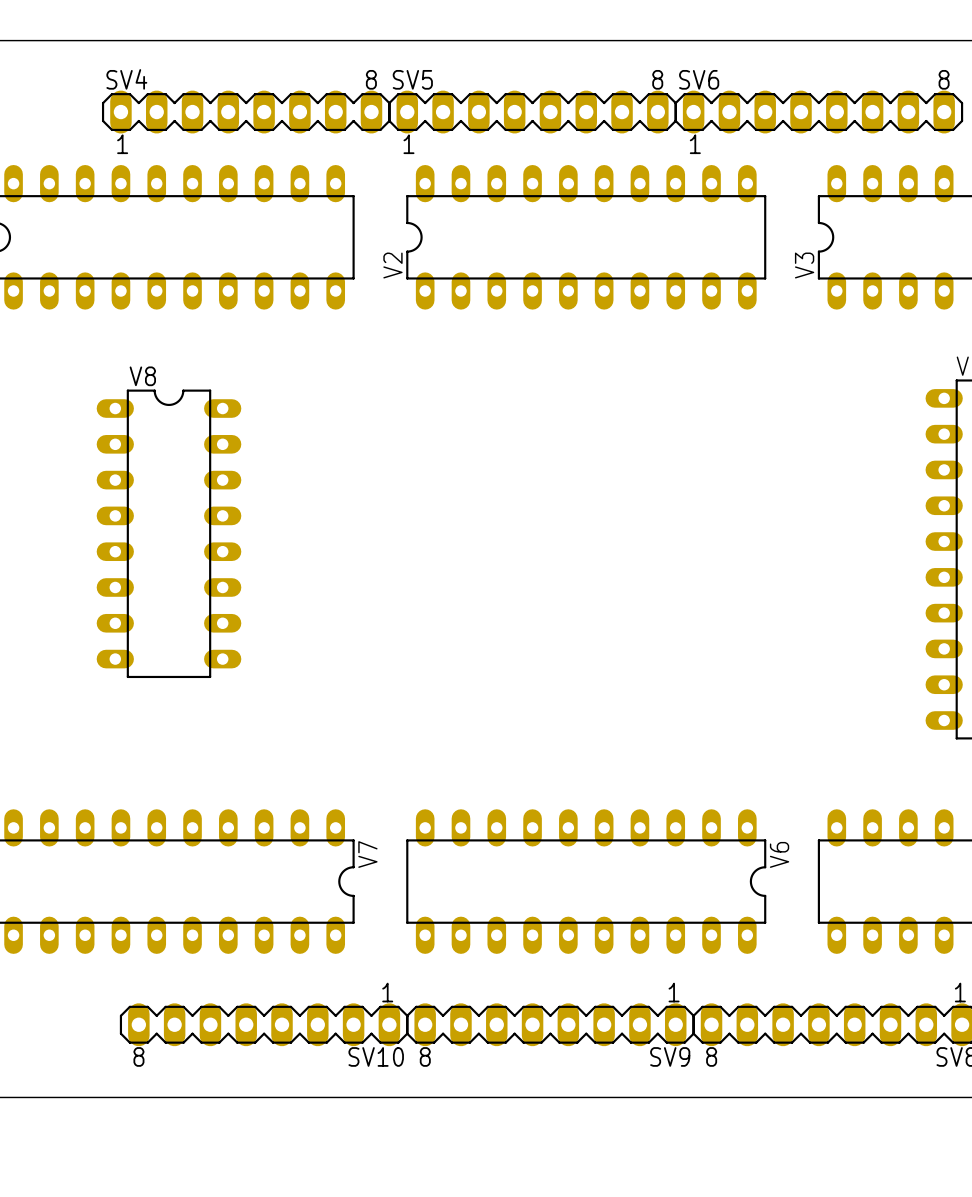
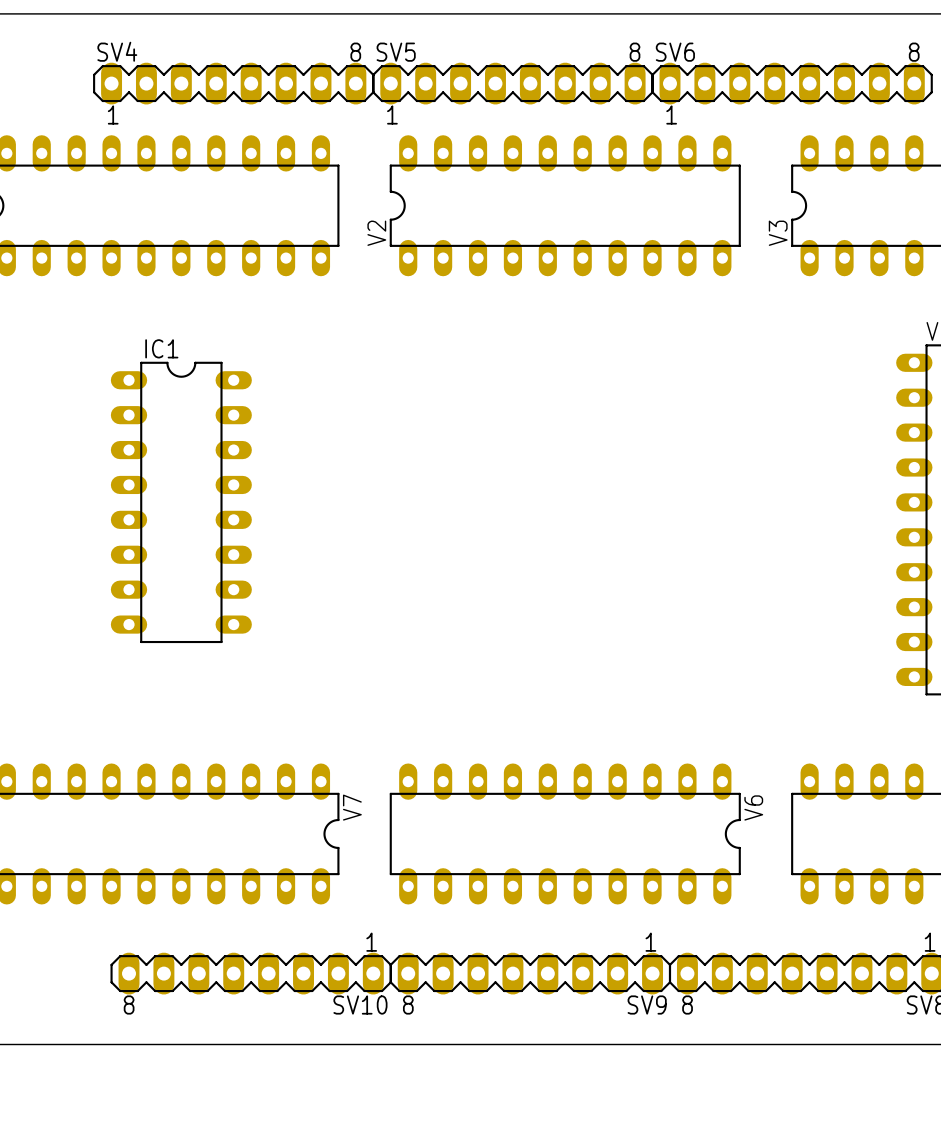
V8: (169, 533) -> none
IC1: none -> (181, 502)

